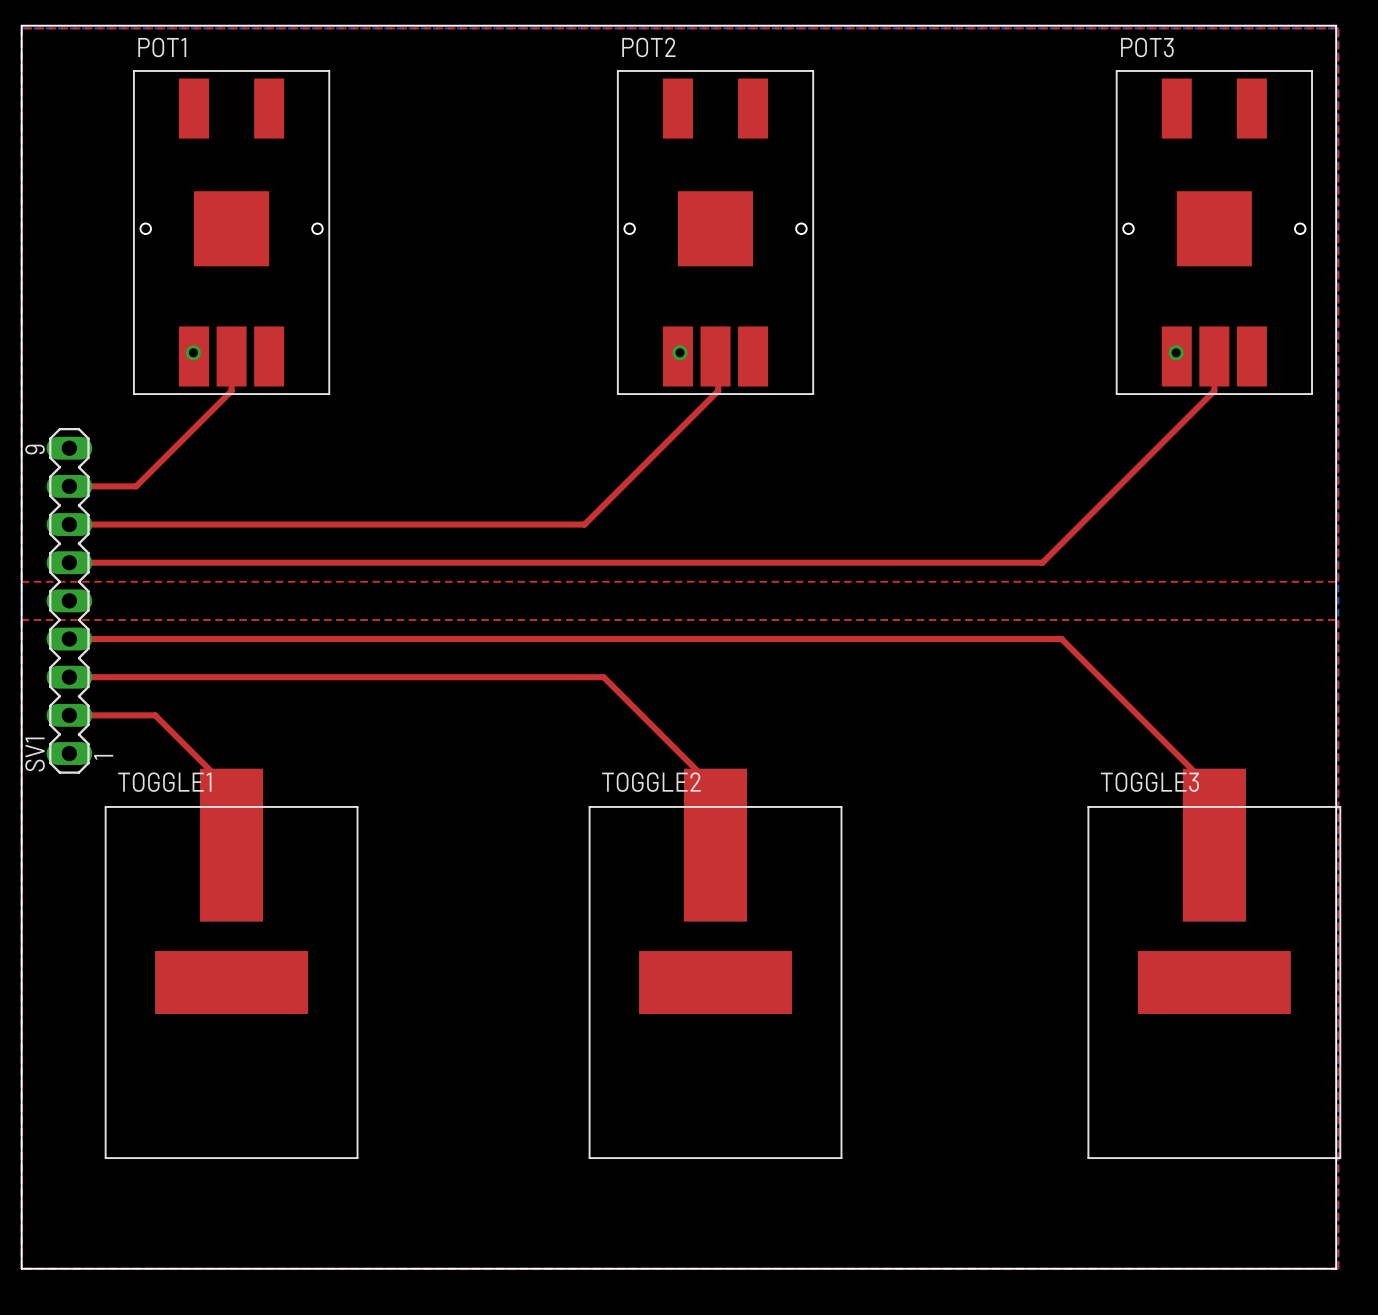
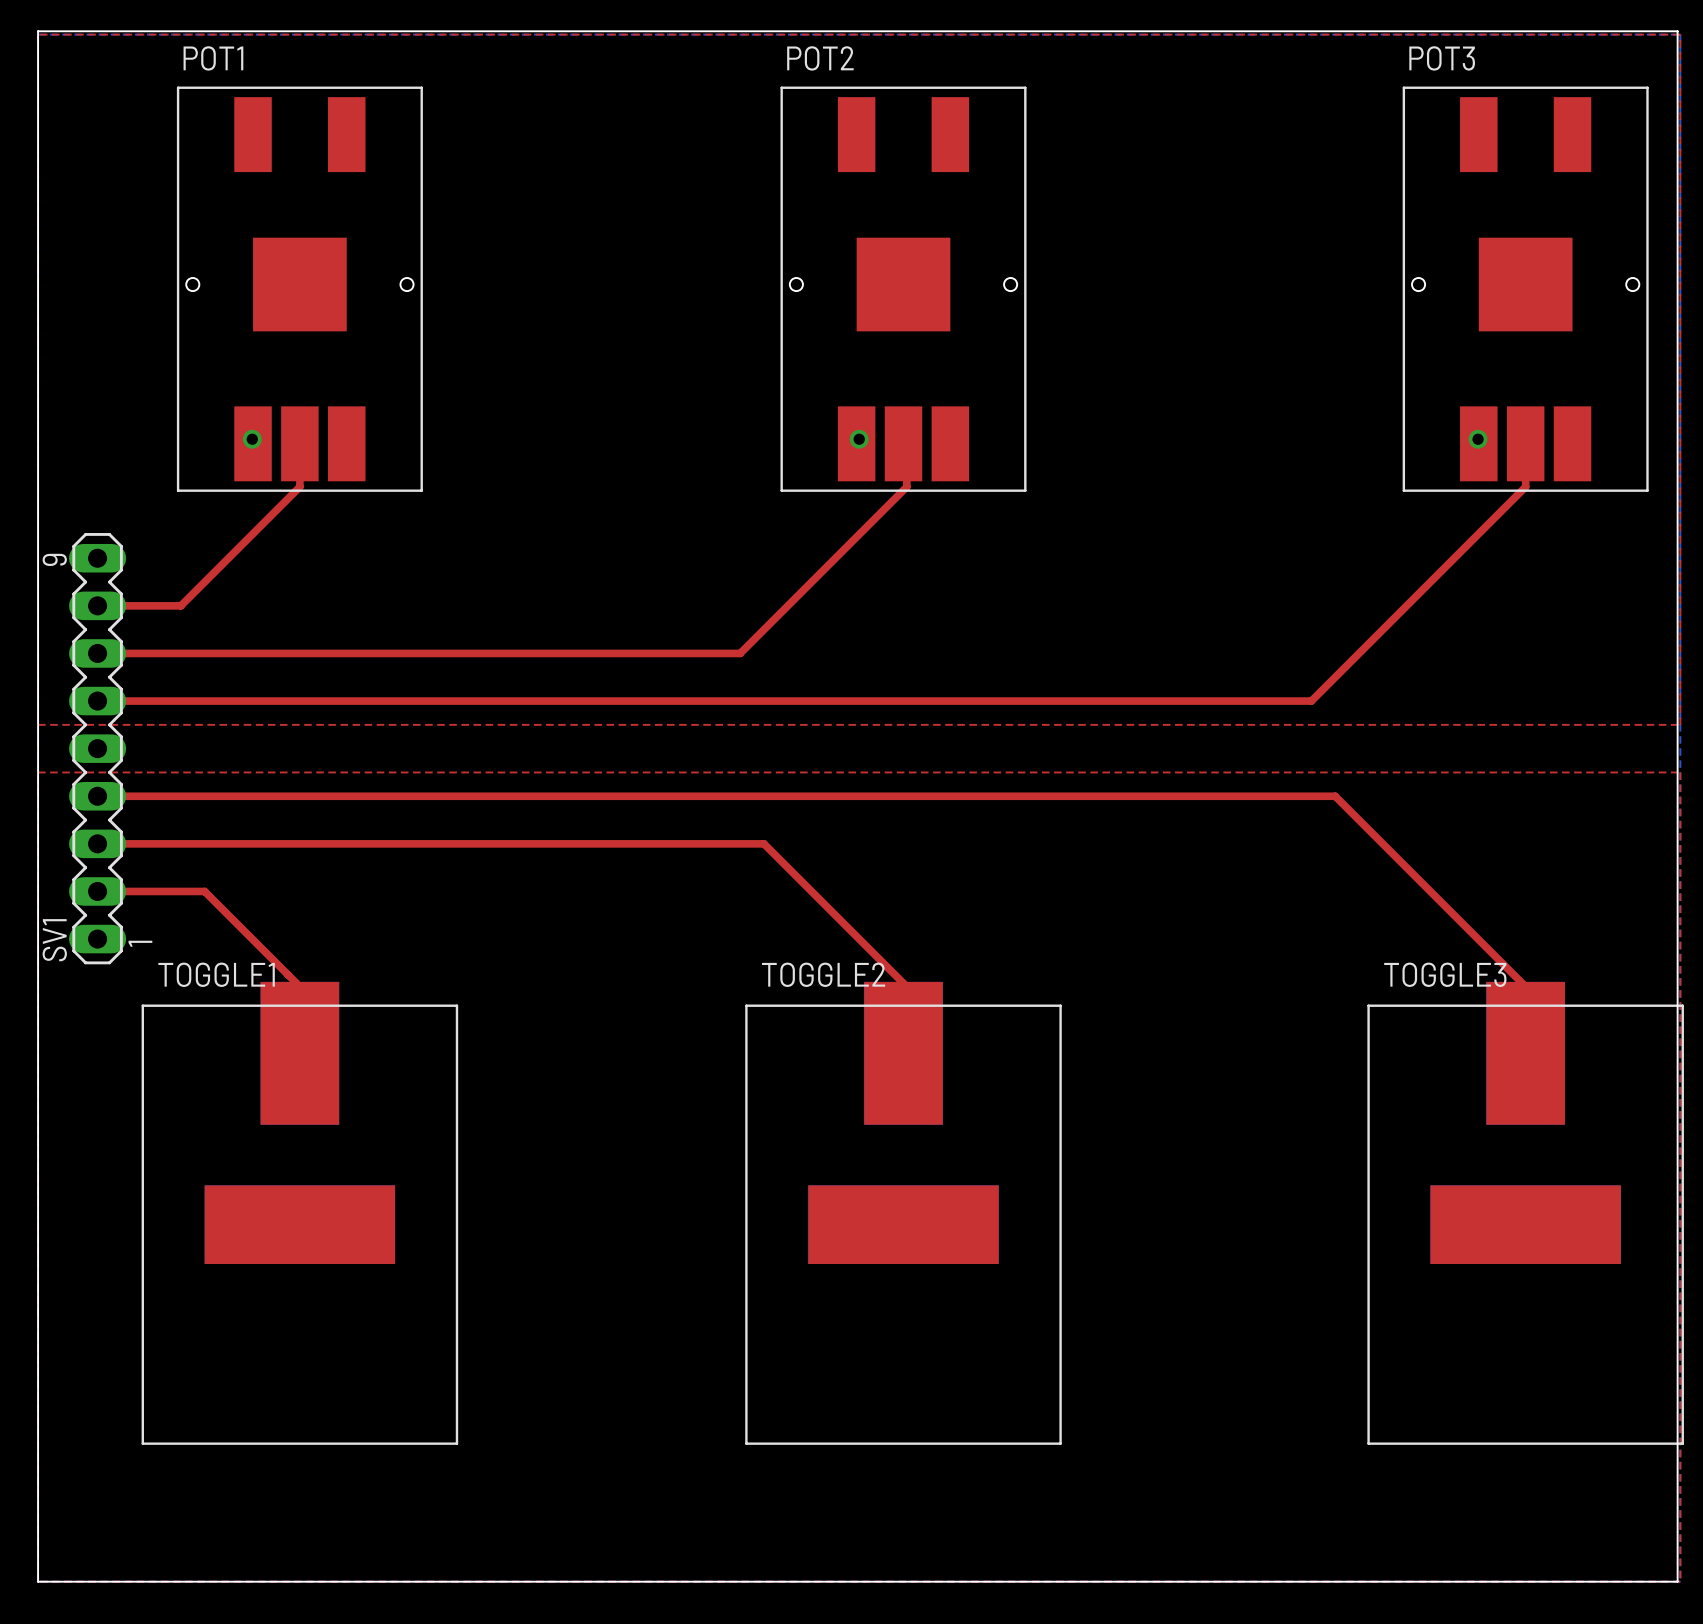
TOGGLE1 footprint: [104, 768, 359, 1160] -> [141, 981, 459, 1445]
TOGGLE2 footprint: [588, 768, 843, 1160] -> [745, 981, 1062, 1445]
TOGGLE3 footprint: [1087, 768, 1342, 1160] -> [1367, 981, 1684, 1445]

